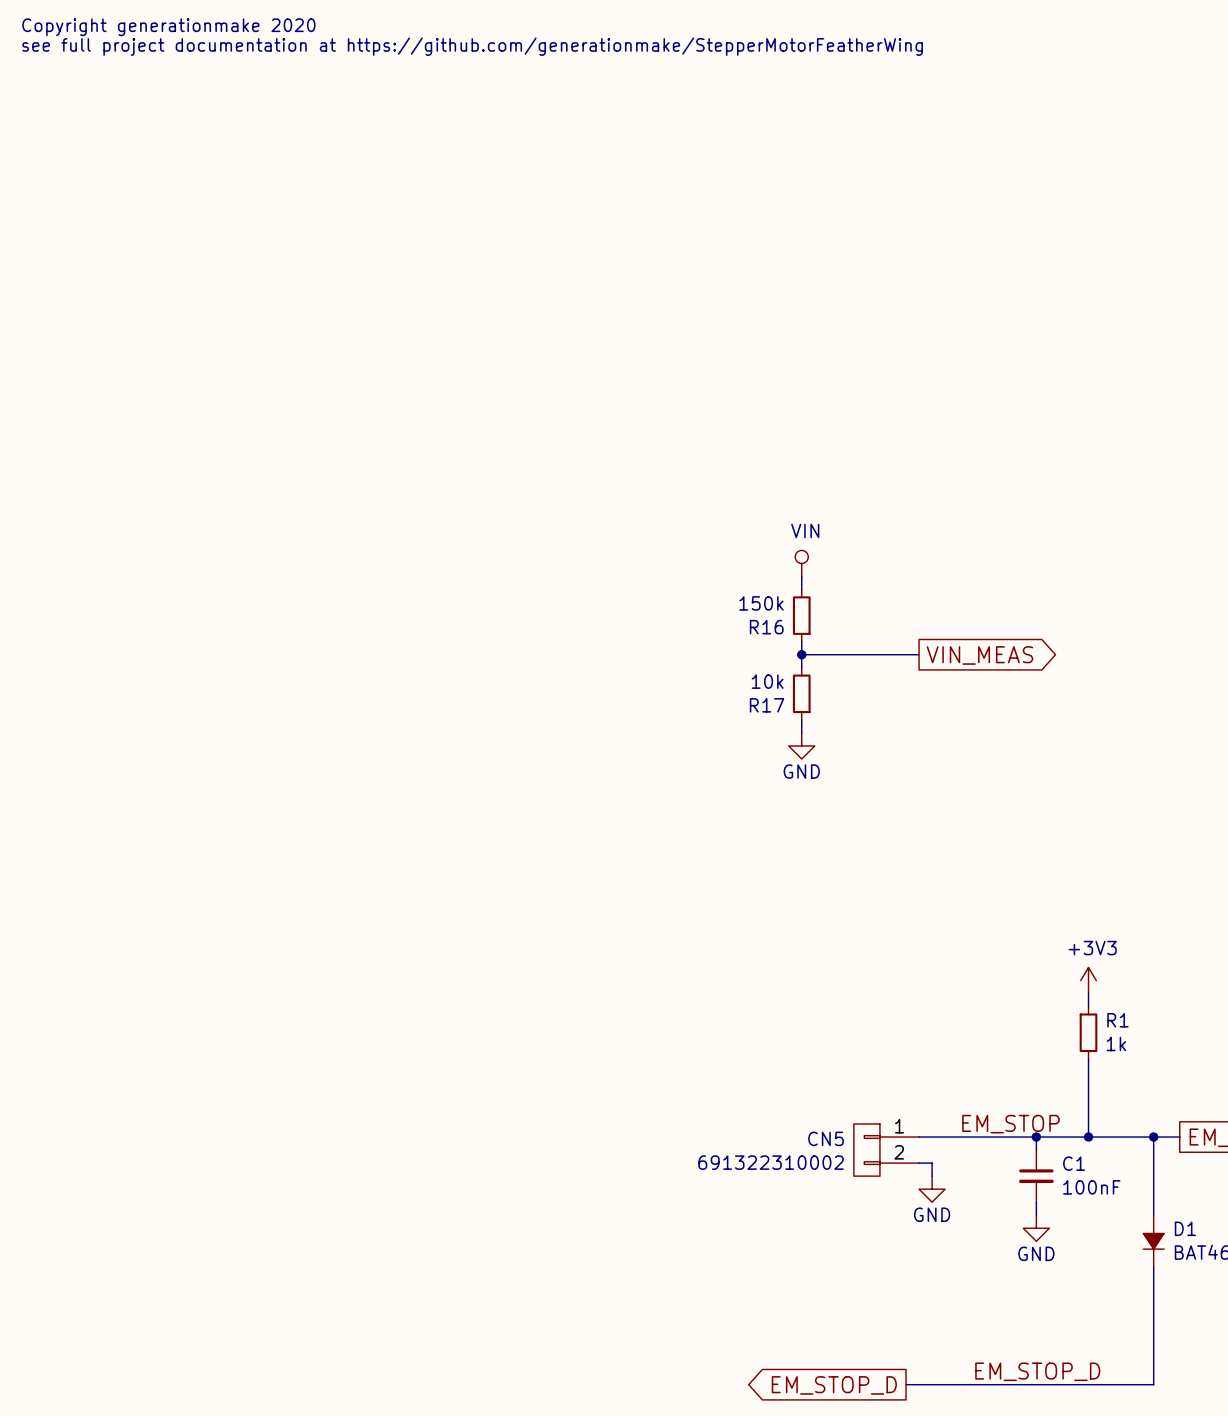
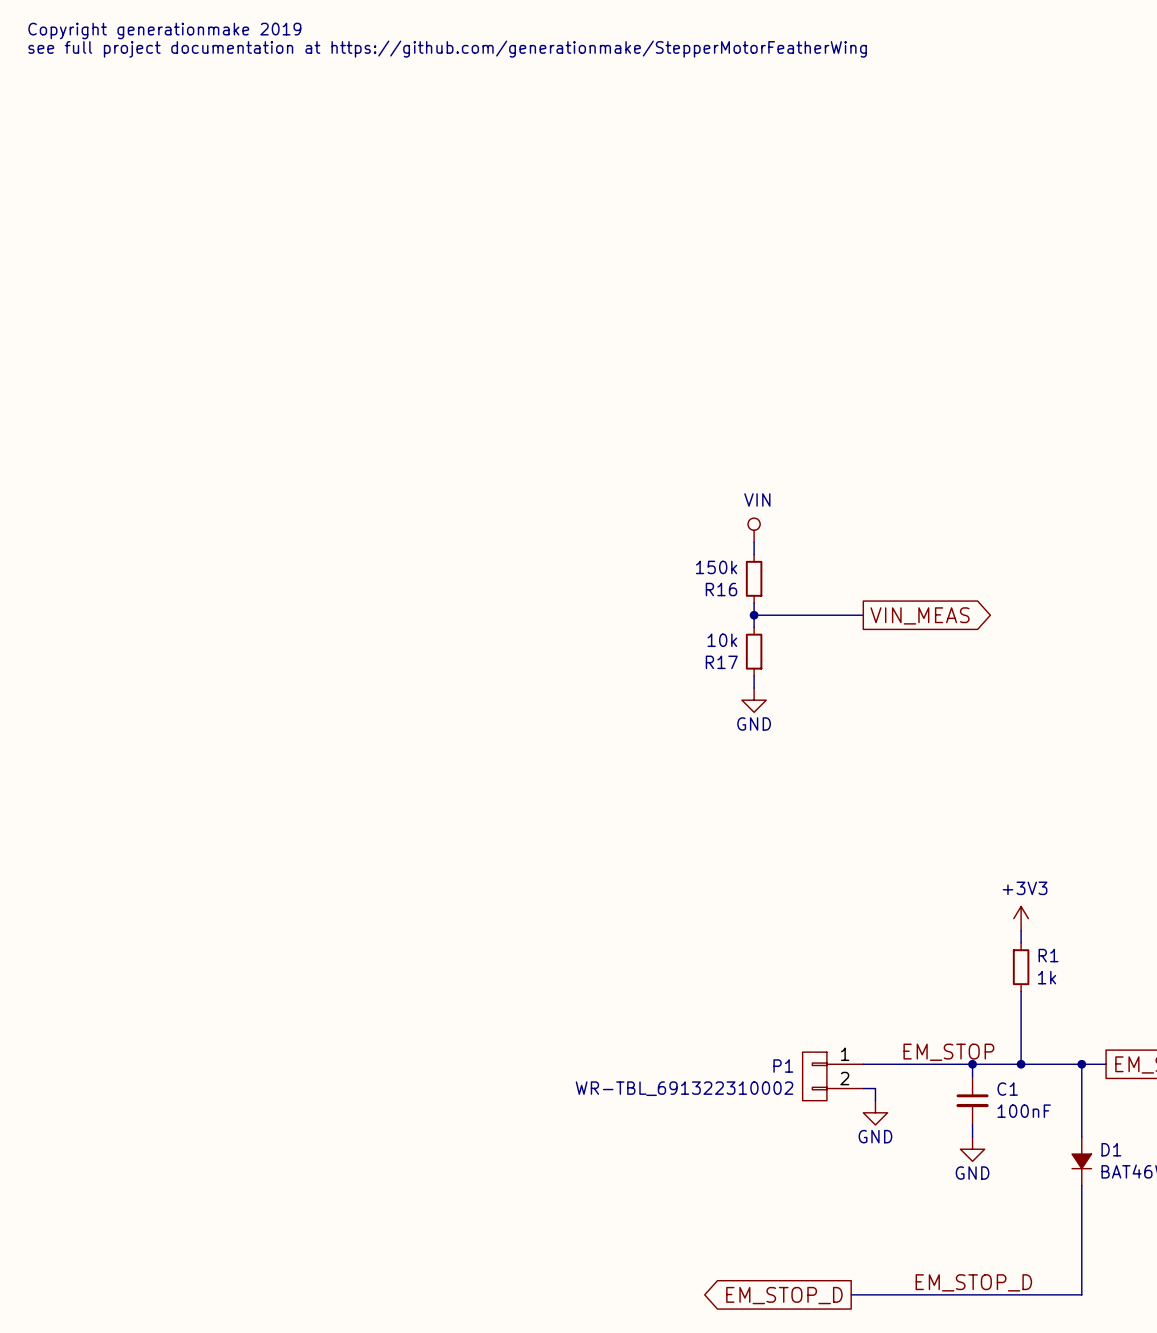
text: Copyright generationmake 2020 (168, 27) -> Copyright generationmake 2019 (164, 30)
CN5 name: CN5 (826, 1138) -> P1 (783, 1066)
CN5 value: 691322310002 (771, 1162) -> WR-TBL_691322310002 (684, 1088)

